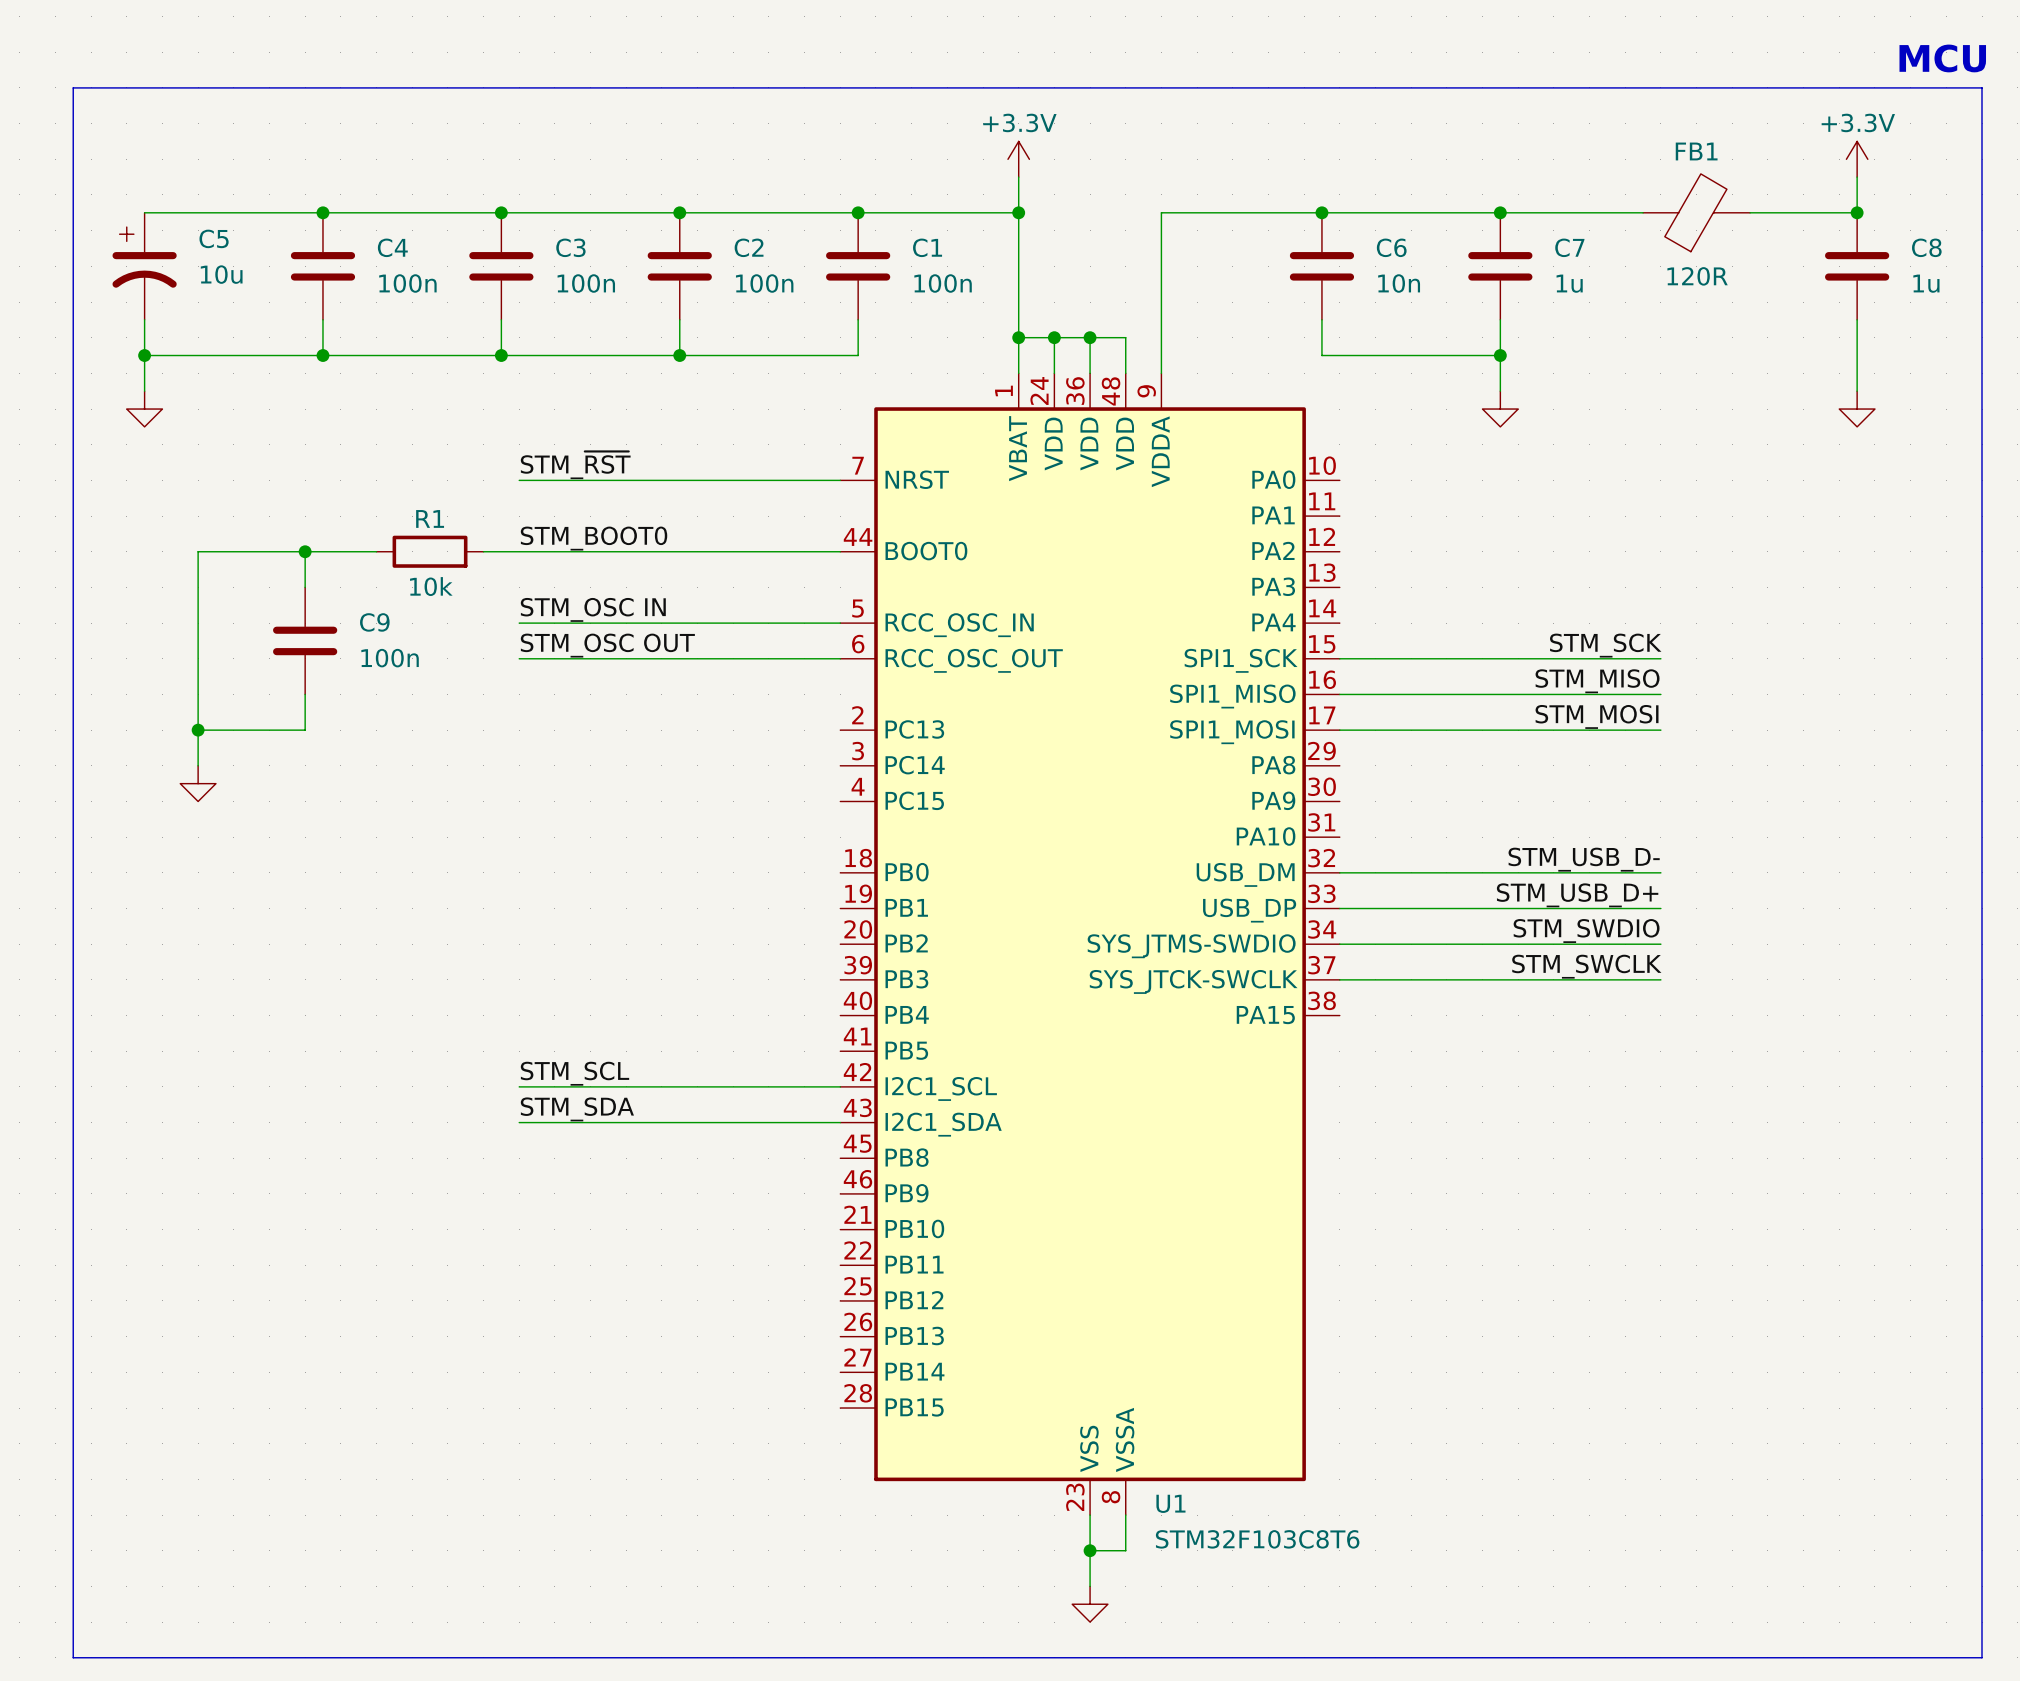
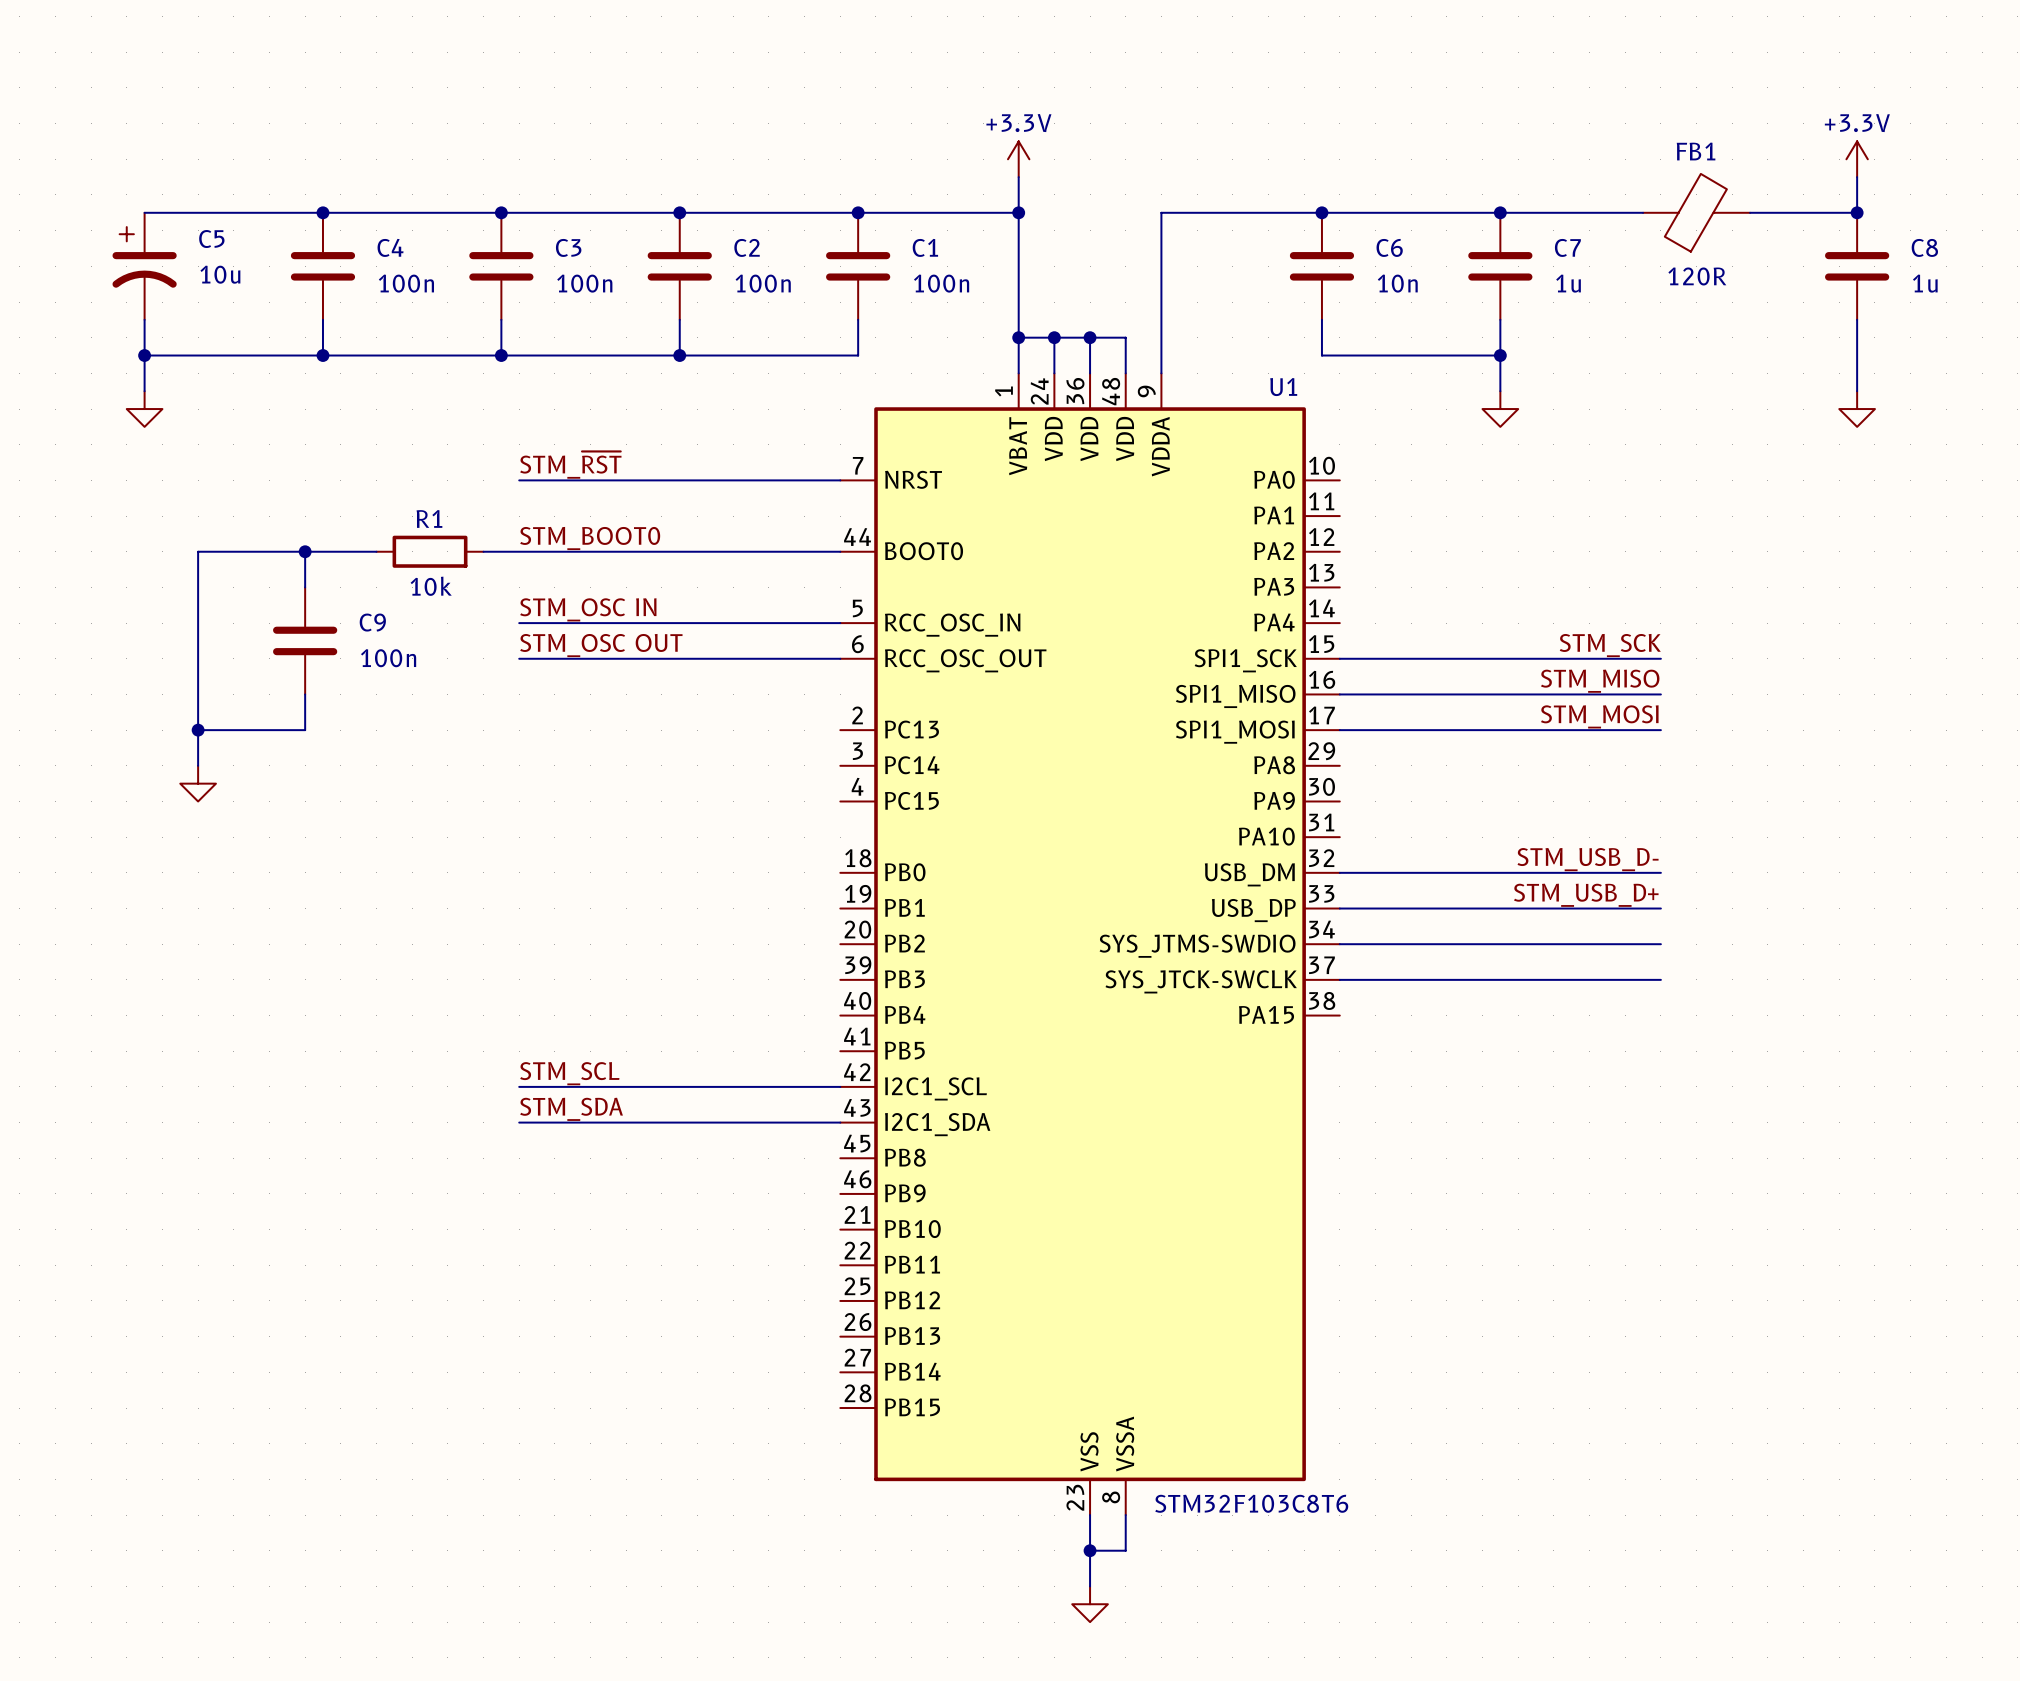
text: MCU (1942, 58) -> none
line: (73, 87) (1982, 87) (1982, 1657) (73, 1657) (73, 87) -> none
label: STM_SWDIO (1586, 931) -> none
label: STM_SWCLK (1586, 966) -> none
U1 name position: U1 (1170, 1503) -> U1 (1283, 387)
U1 value position: STM32F103C8T6 (1257, 1539) -> STM32F103C8T6 (1251, 1503)

